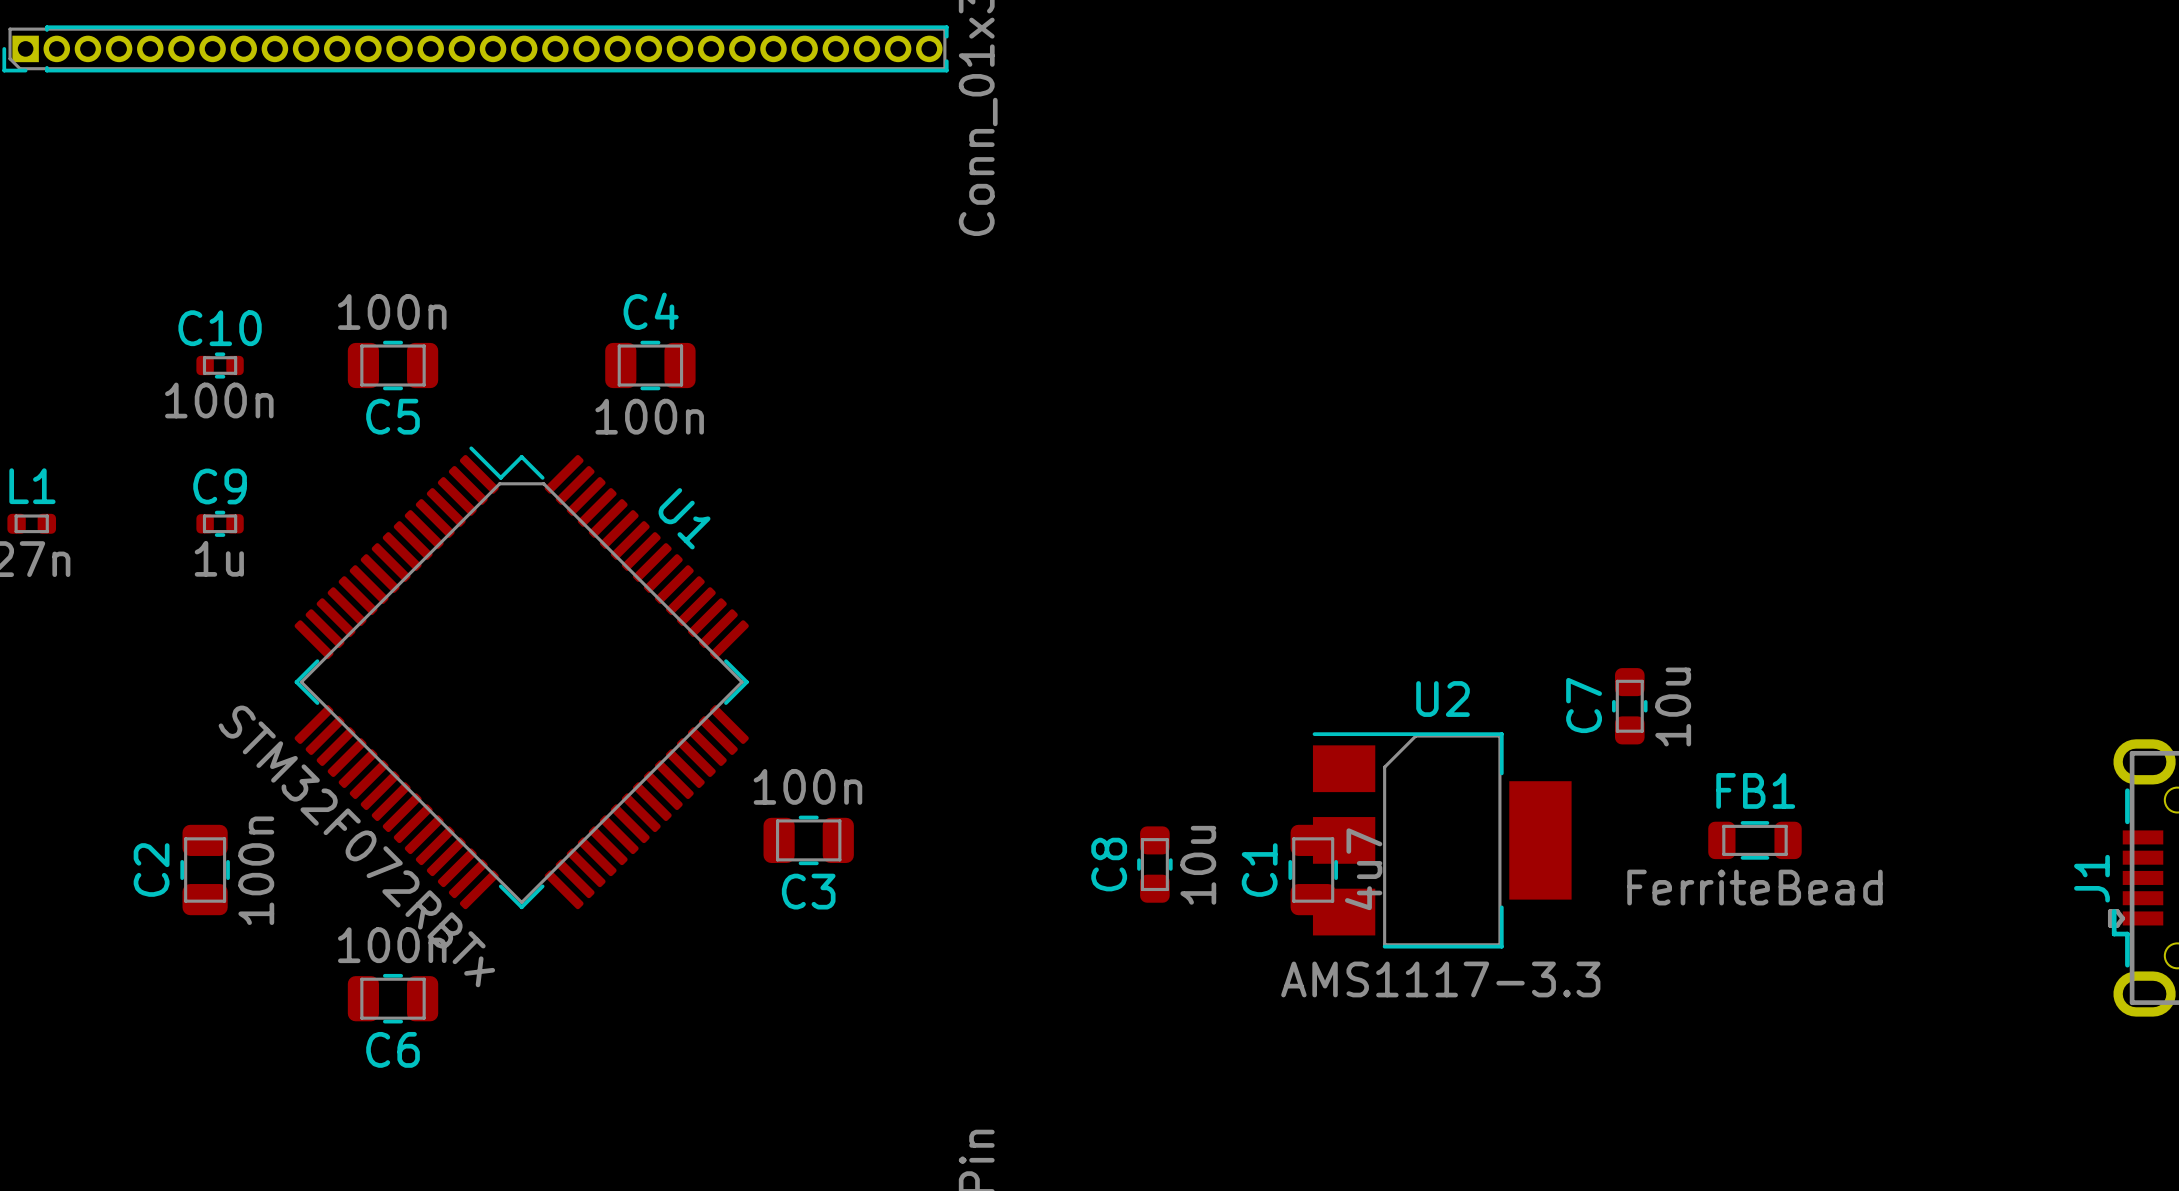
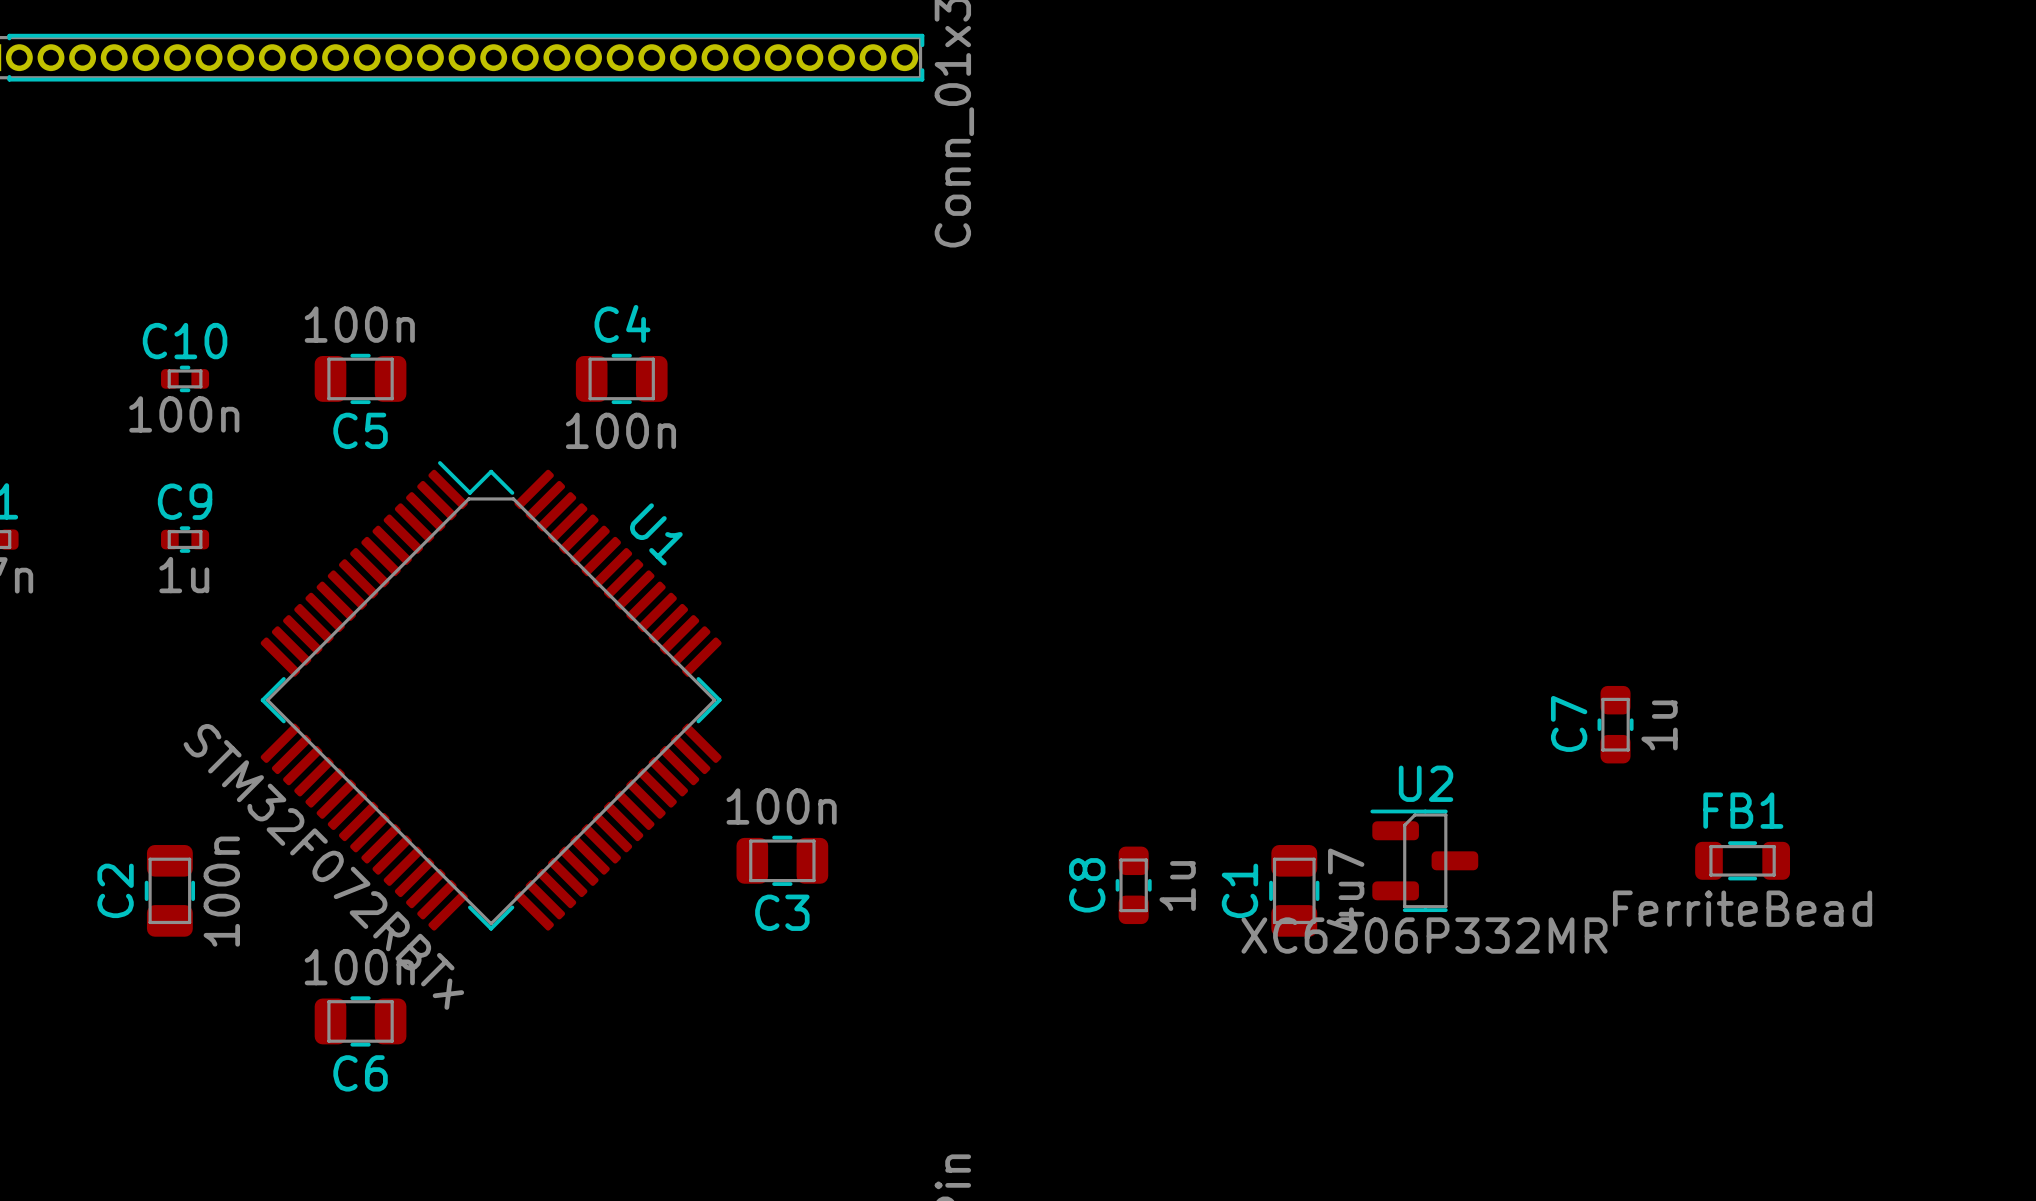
U2 name position: U2 (1443, 699) -> U2 (1426, 783)
C7 value: 10u (1673, 706) -> 1u (1659, 725)
U2 footprint: [1312, 732, 1572, 949] -> [1370, 809, 1479, 913]
C8 value: 10u (1198, 865) -> 1u (1177, 886)
U2 value: AMS1117-3.3 (1440, 979) -> XC6206P332MR (1424, 935)

